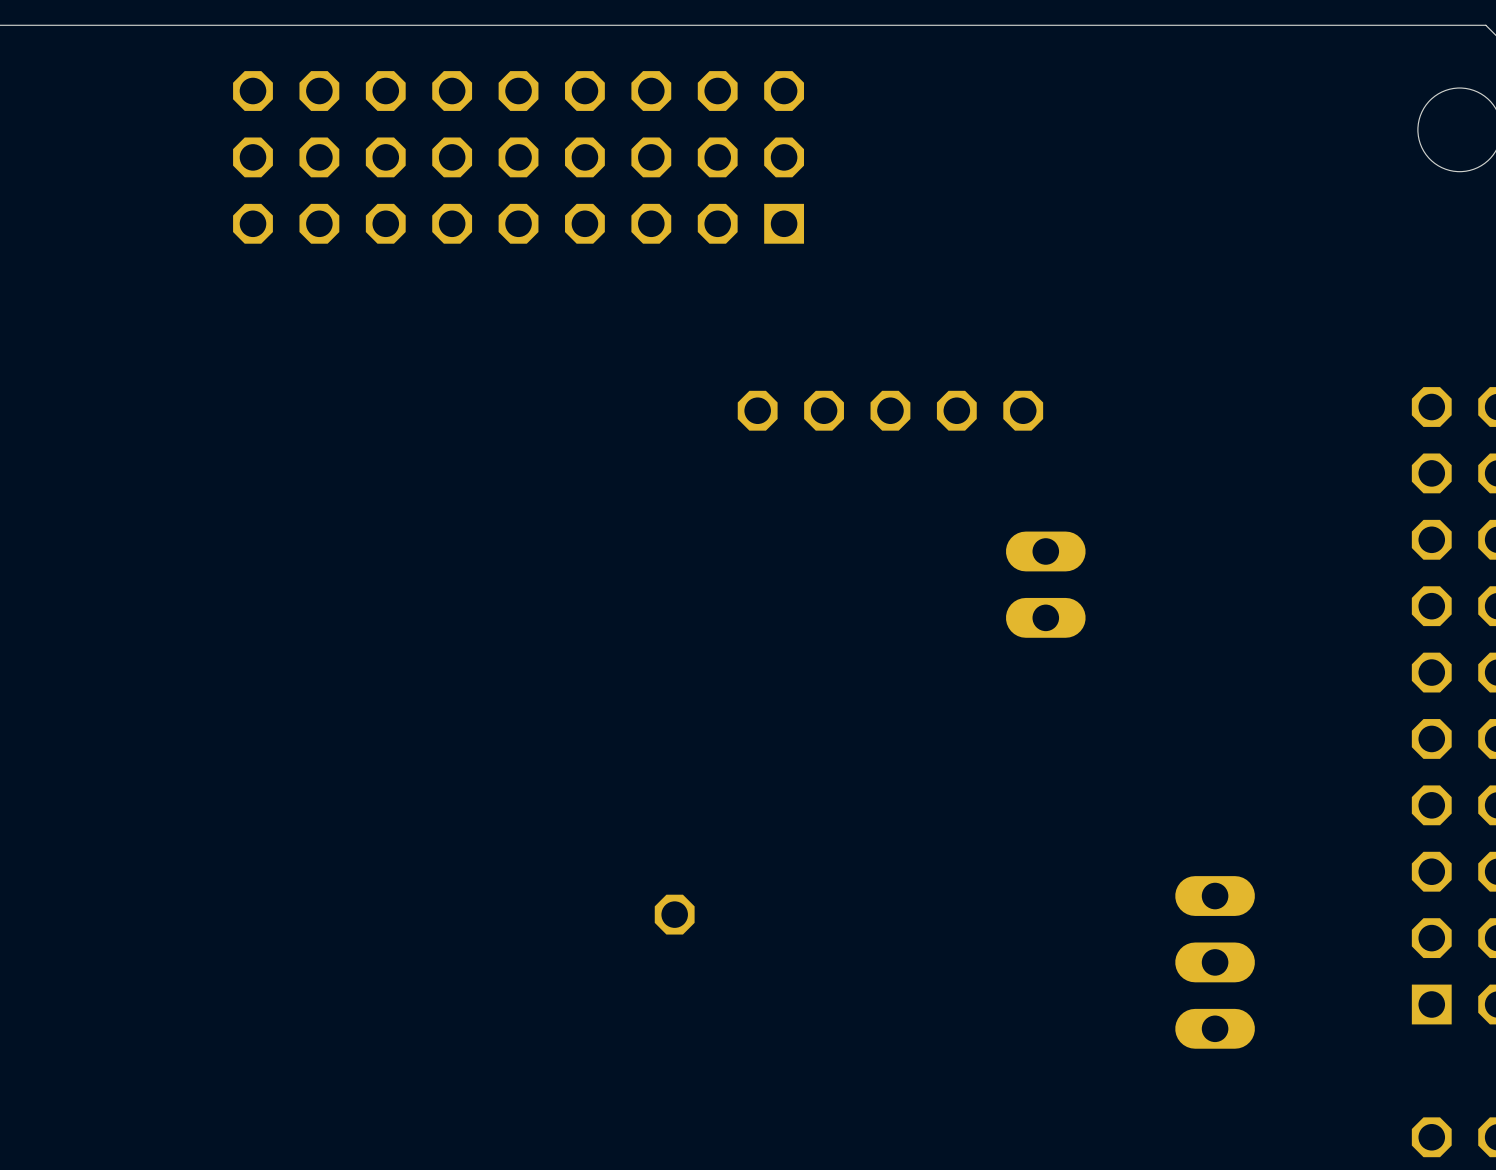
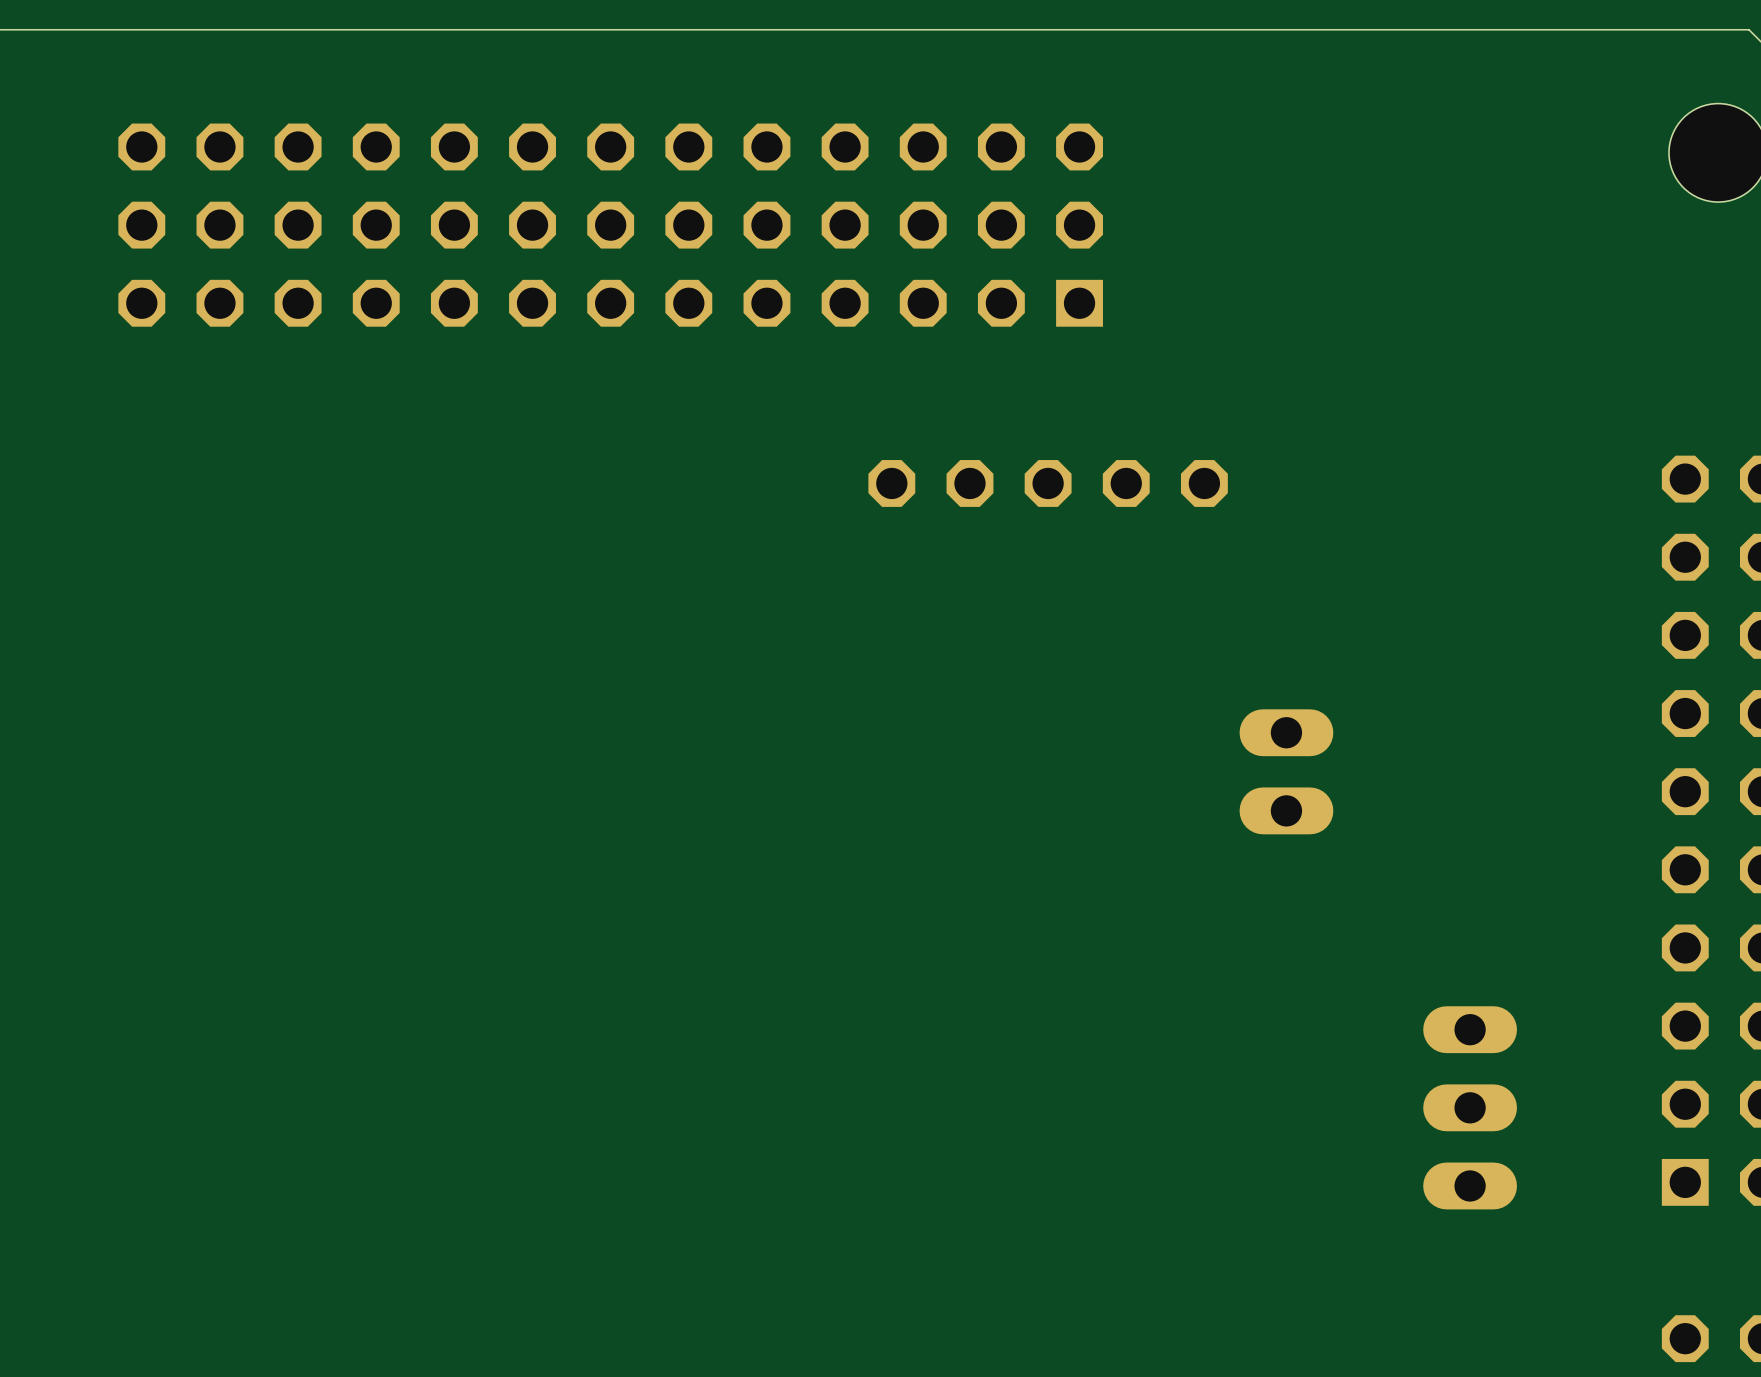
part: (518, 157) -> none
part: none -> (610, 225)
part position: (1045, 584) -> (1286, 771)
part: (674, 914) -> none
part position: (1215, 962) -> (1470, 1107)

